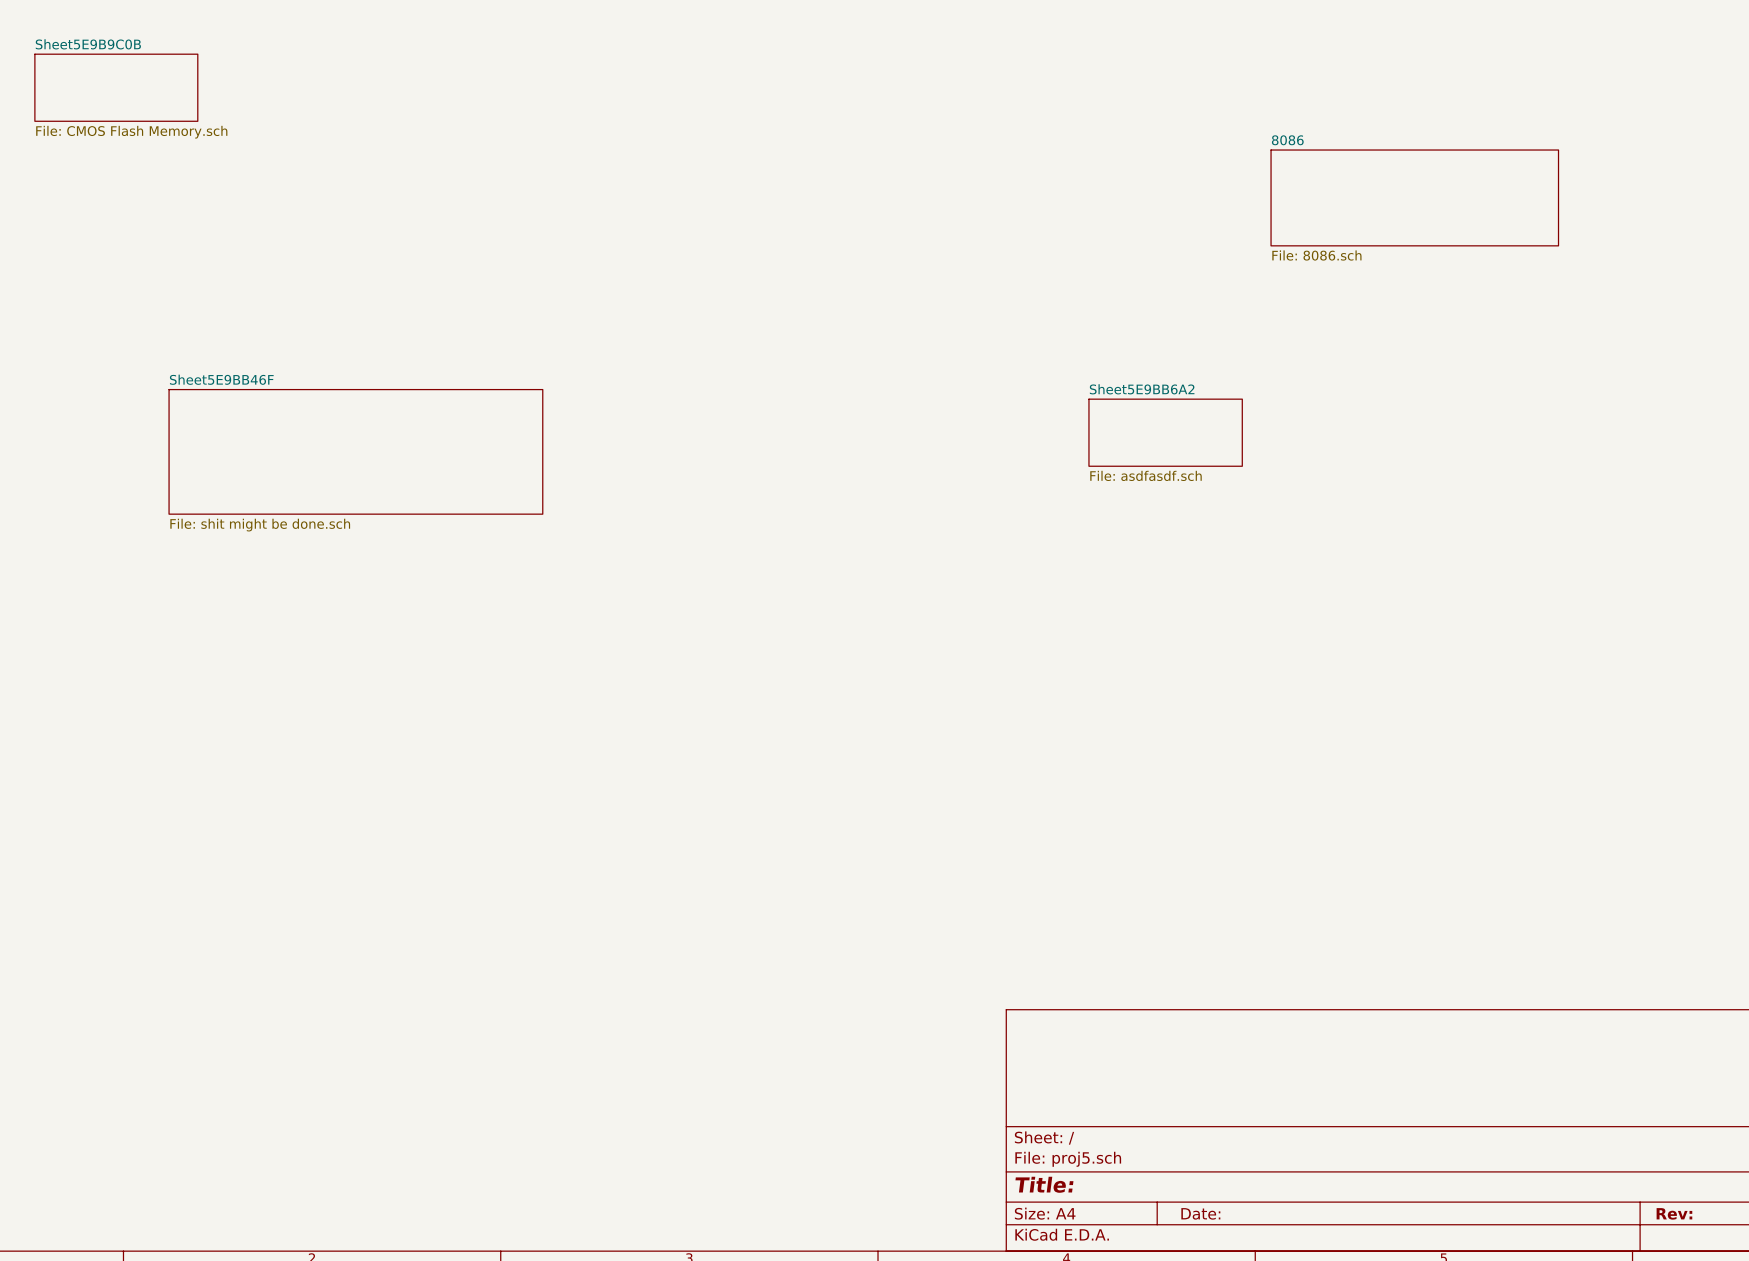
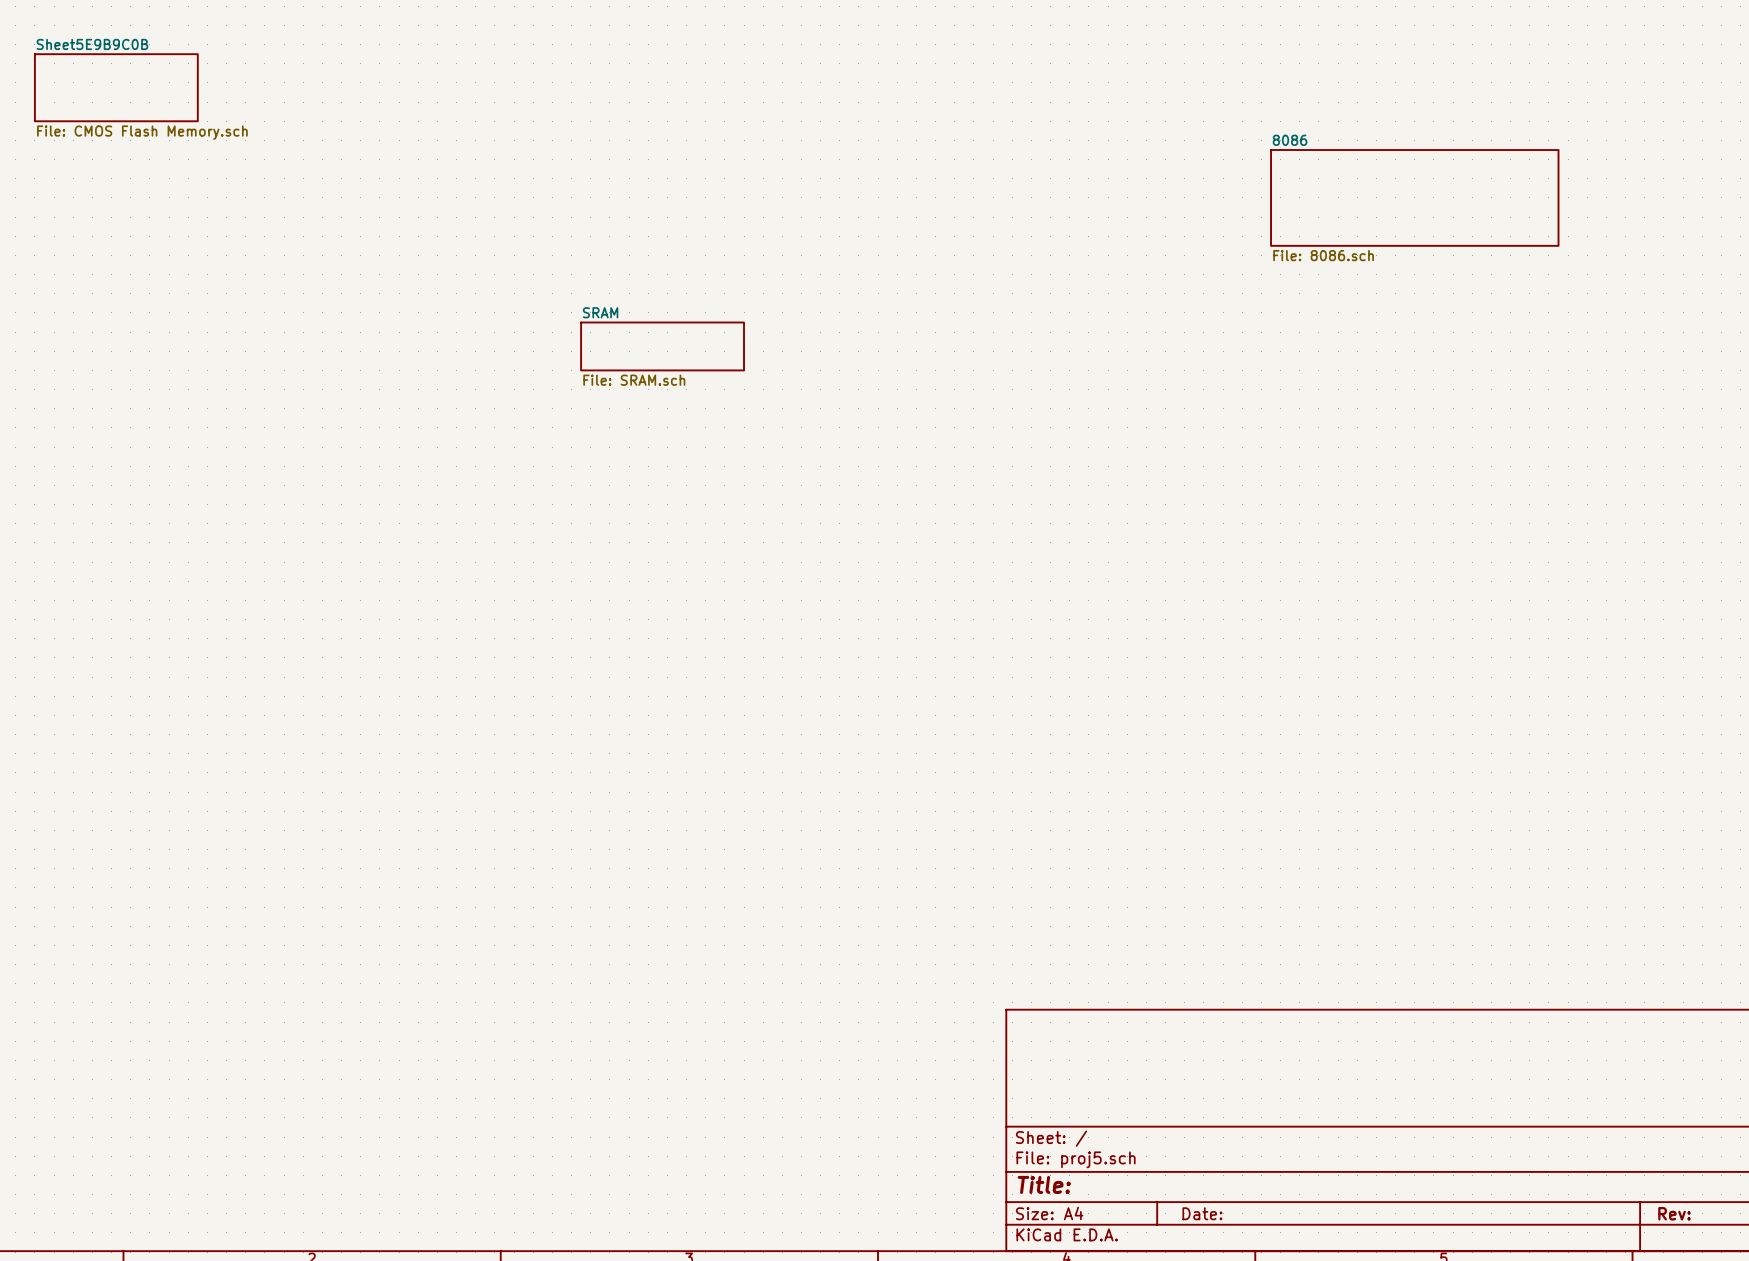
sheet SRAM: none -> File: SRAM.sch (662, 346)
sheet Sheet5E9BB6A2: File: asdfasdf.sch (1165, 432) -> none
sheet Sheet5E9BB46F: File: shit might be done.sch (355, 451) -> none

